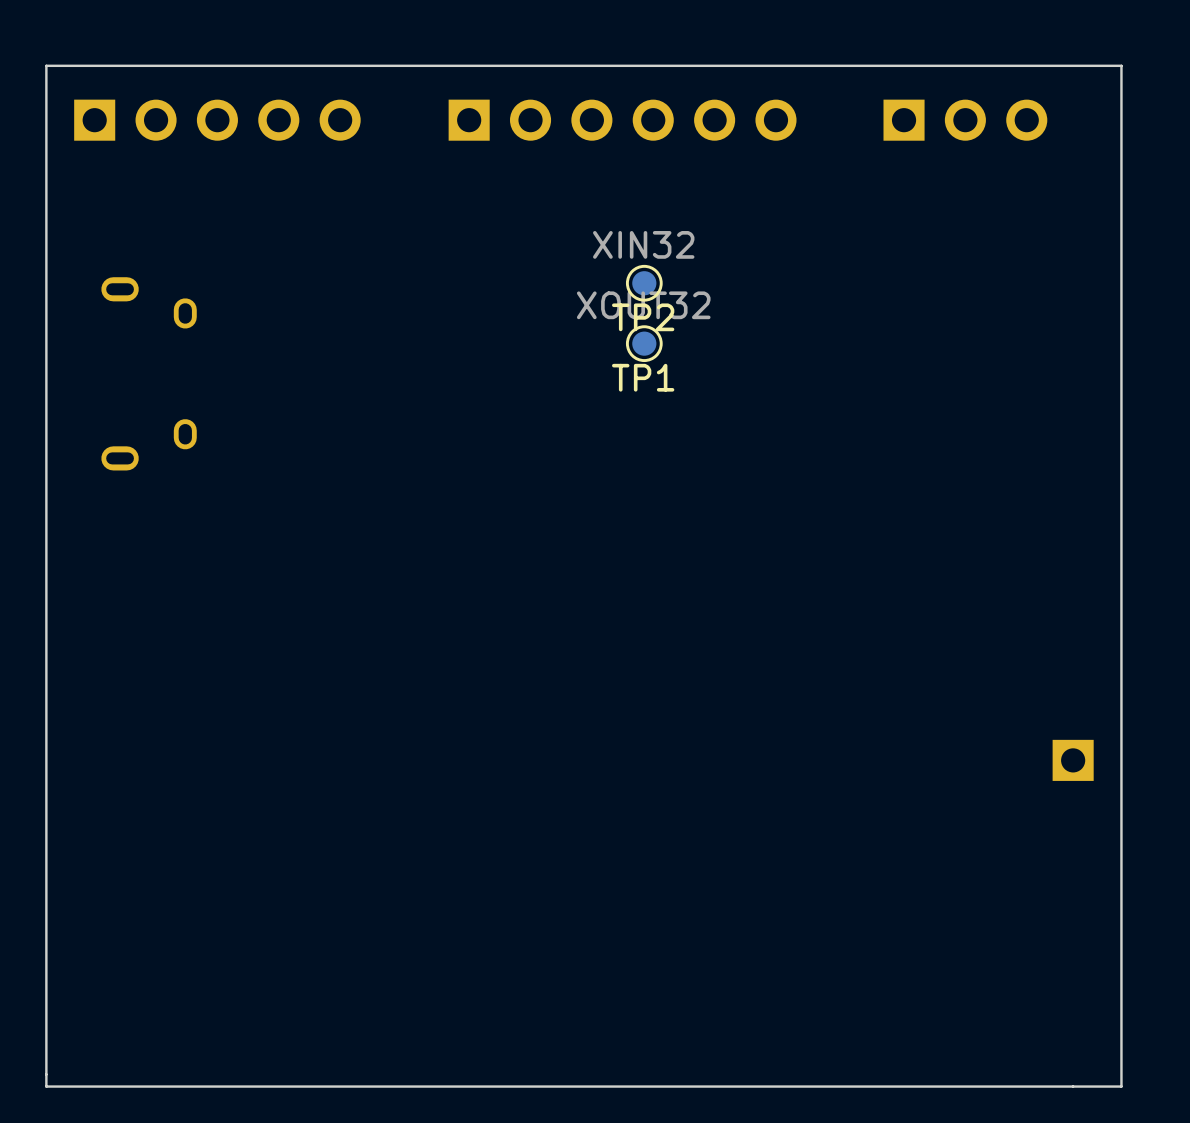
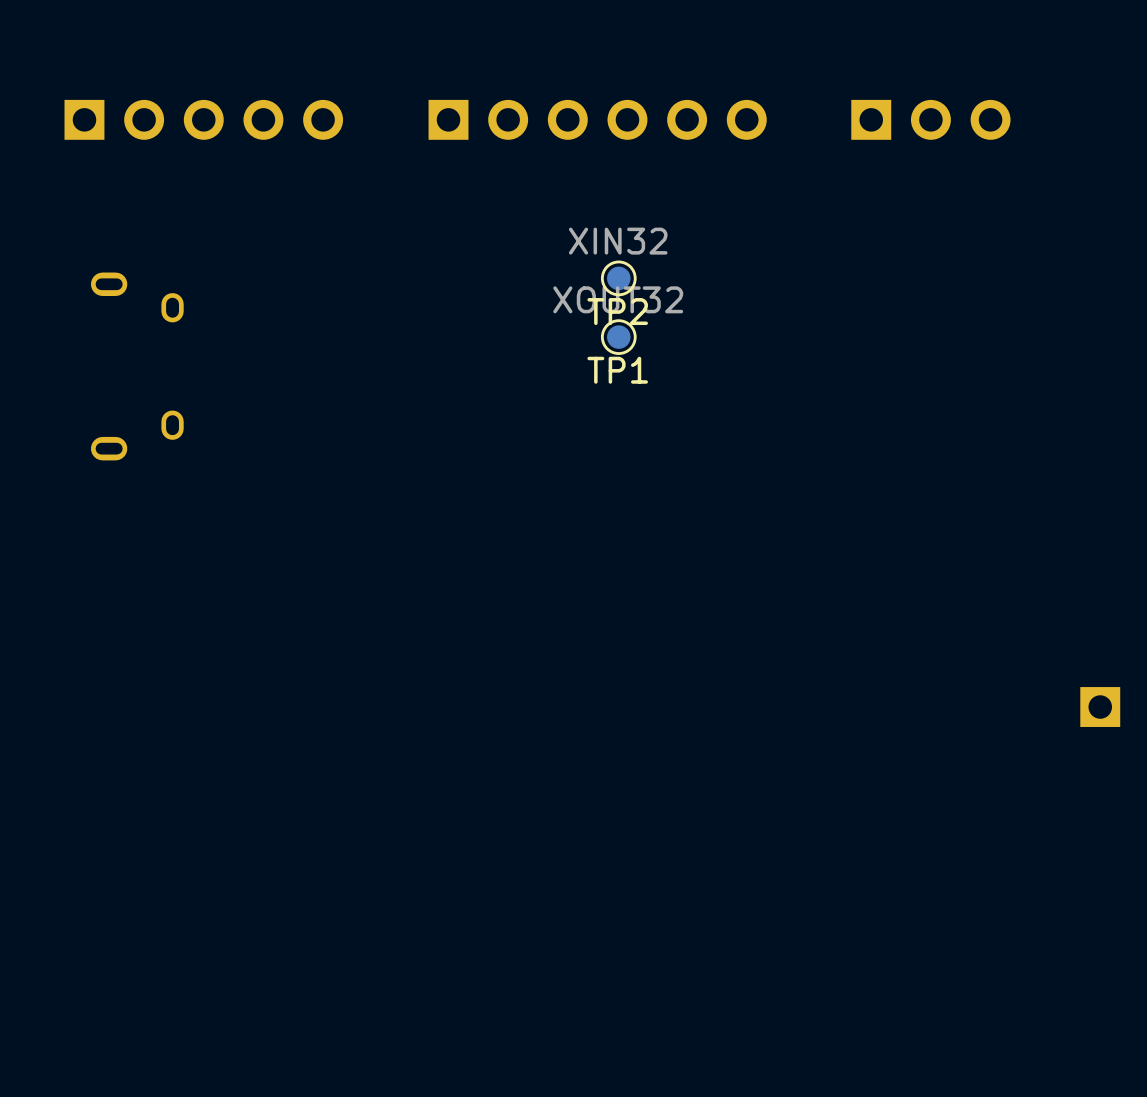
board edge: (1121, 65) (1121, 1086) (46, 1086) (46, 65) (1121, 65) -> none
part position: (1073, 760) -> (1100, 707)

